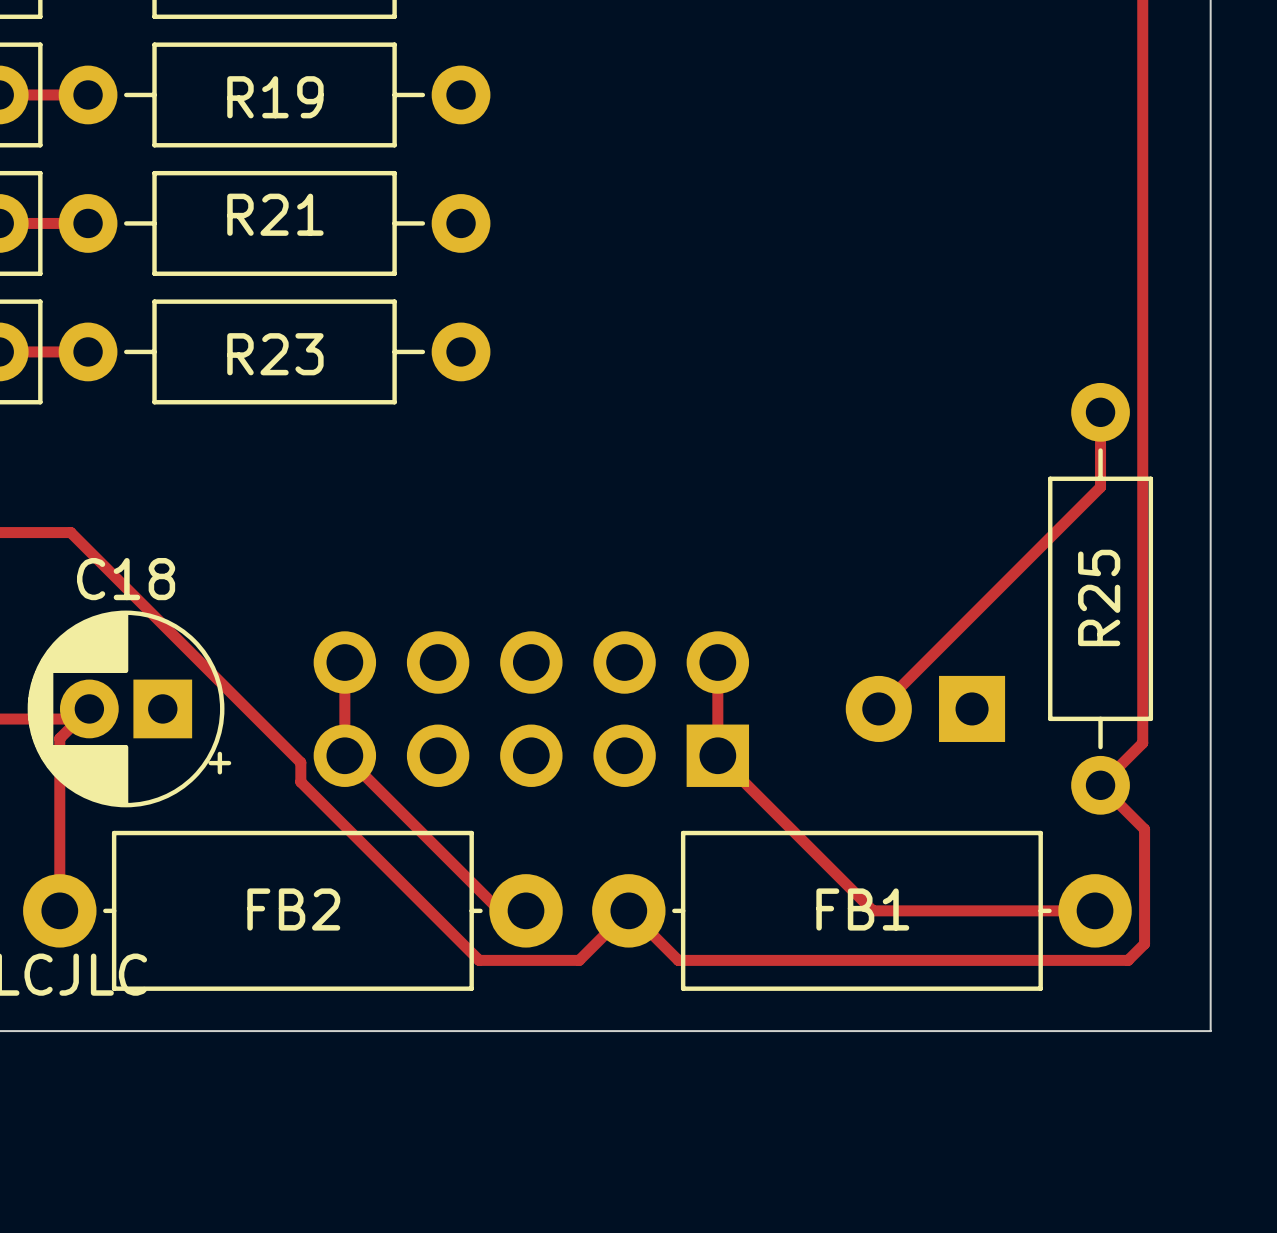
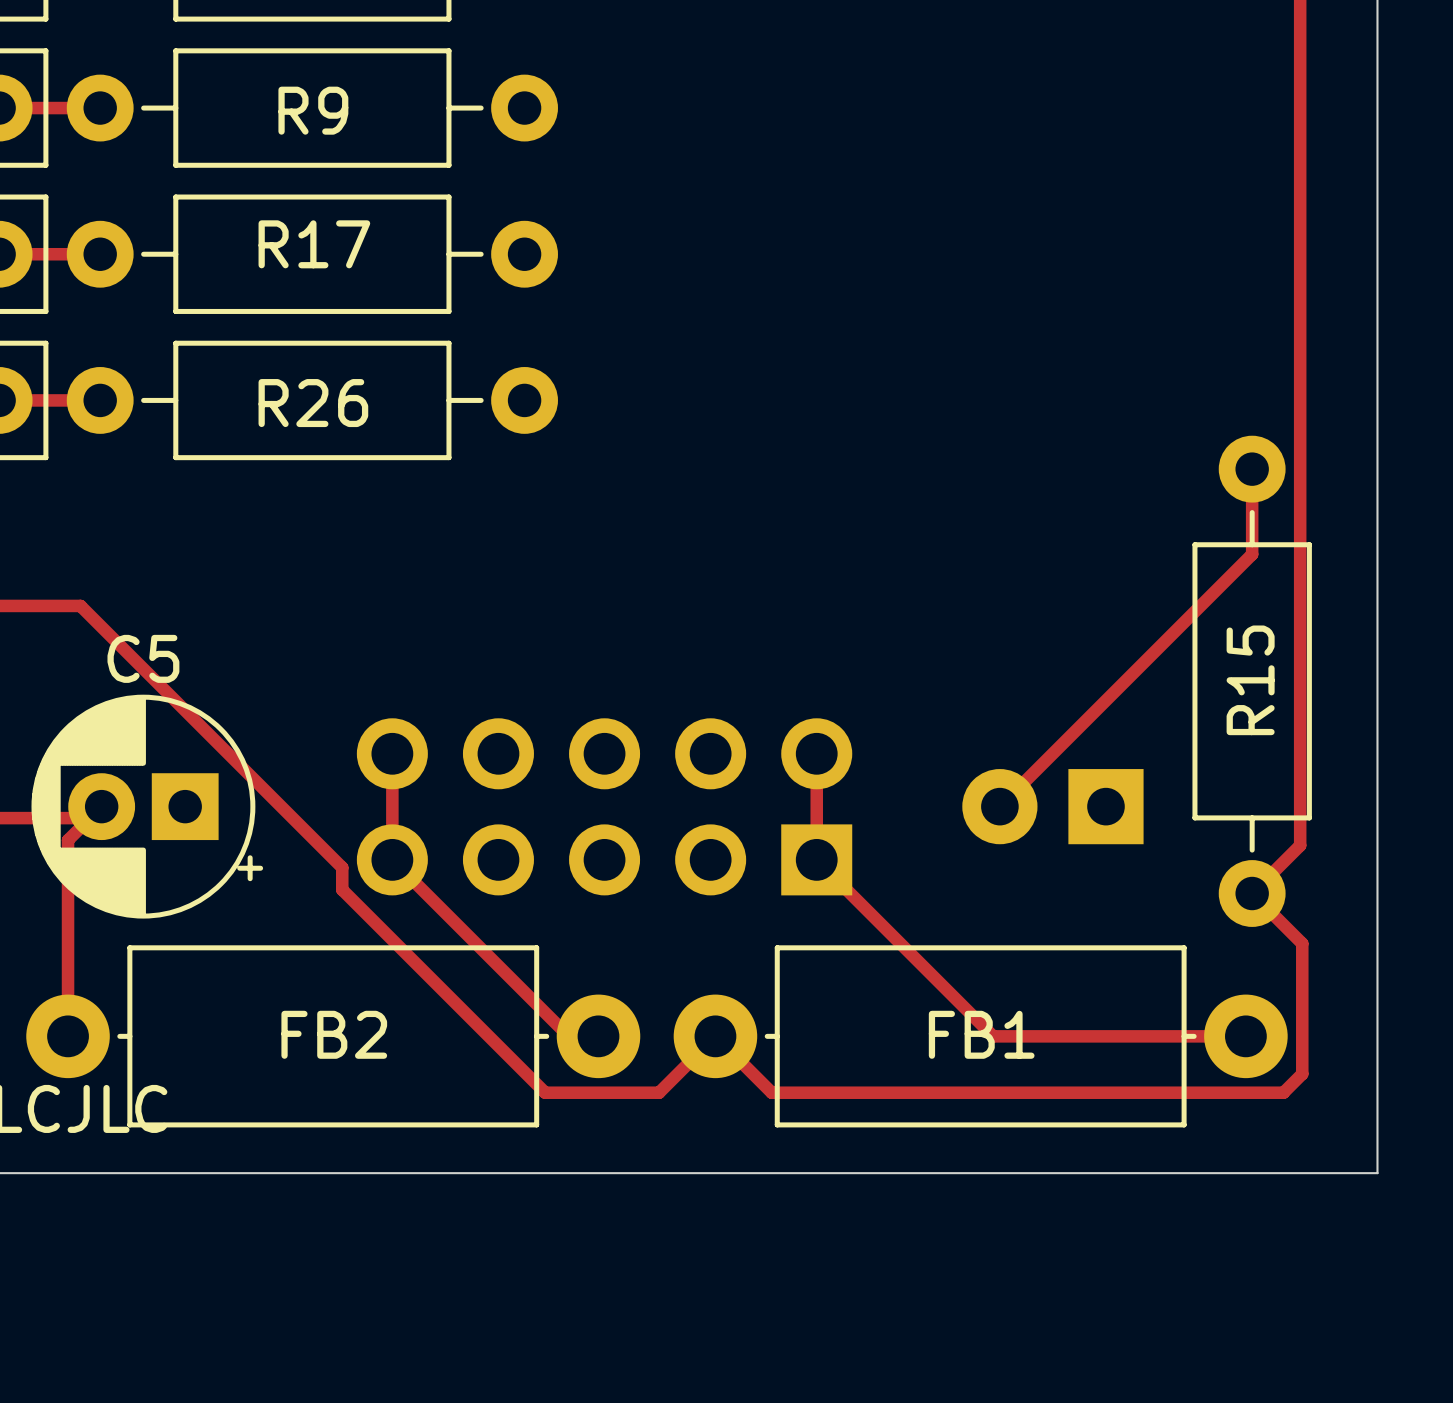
R19 name: R19 (275, 97) -> R9 (313, 110)
R21 name: R21 (275, 214) -> R17 (314, 244)
R23 name: R23 (275, 354) -> R26 (313, 403)
C18 name: C18 (126, 579) -> C5 (143, 658)
R25 name: R25 (1099, 597) -> R15 (1250, 680)

